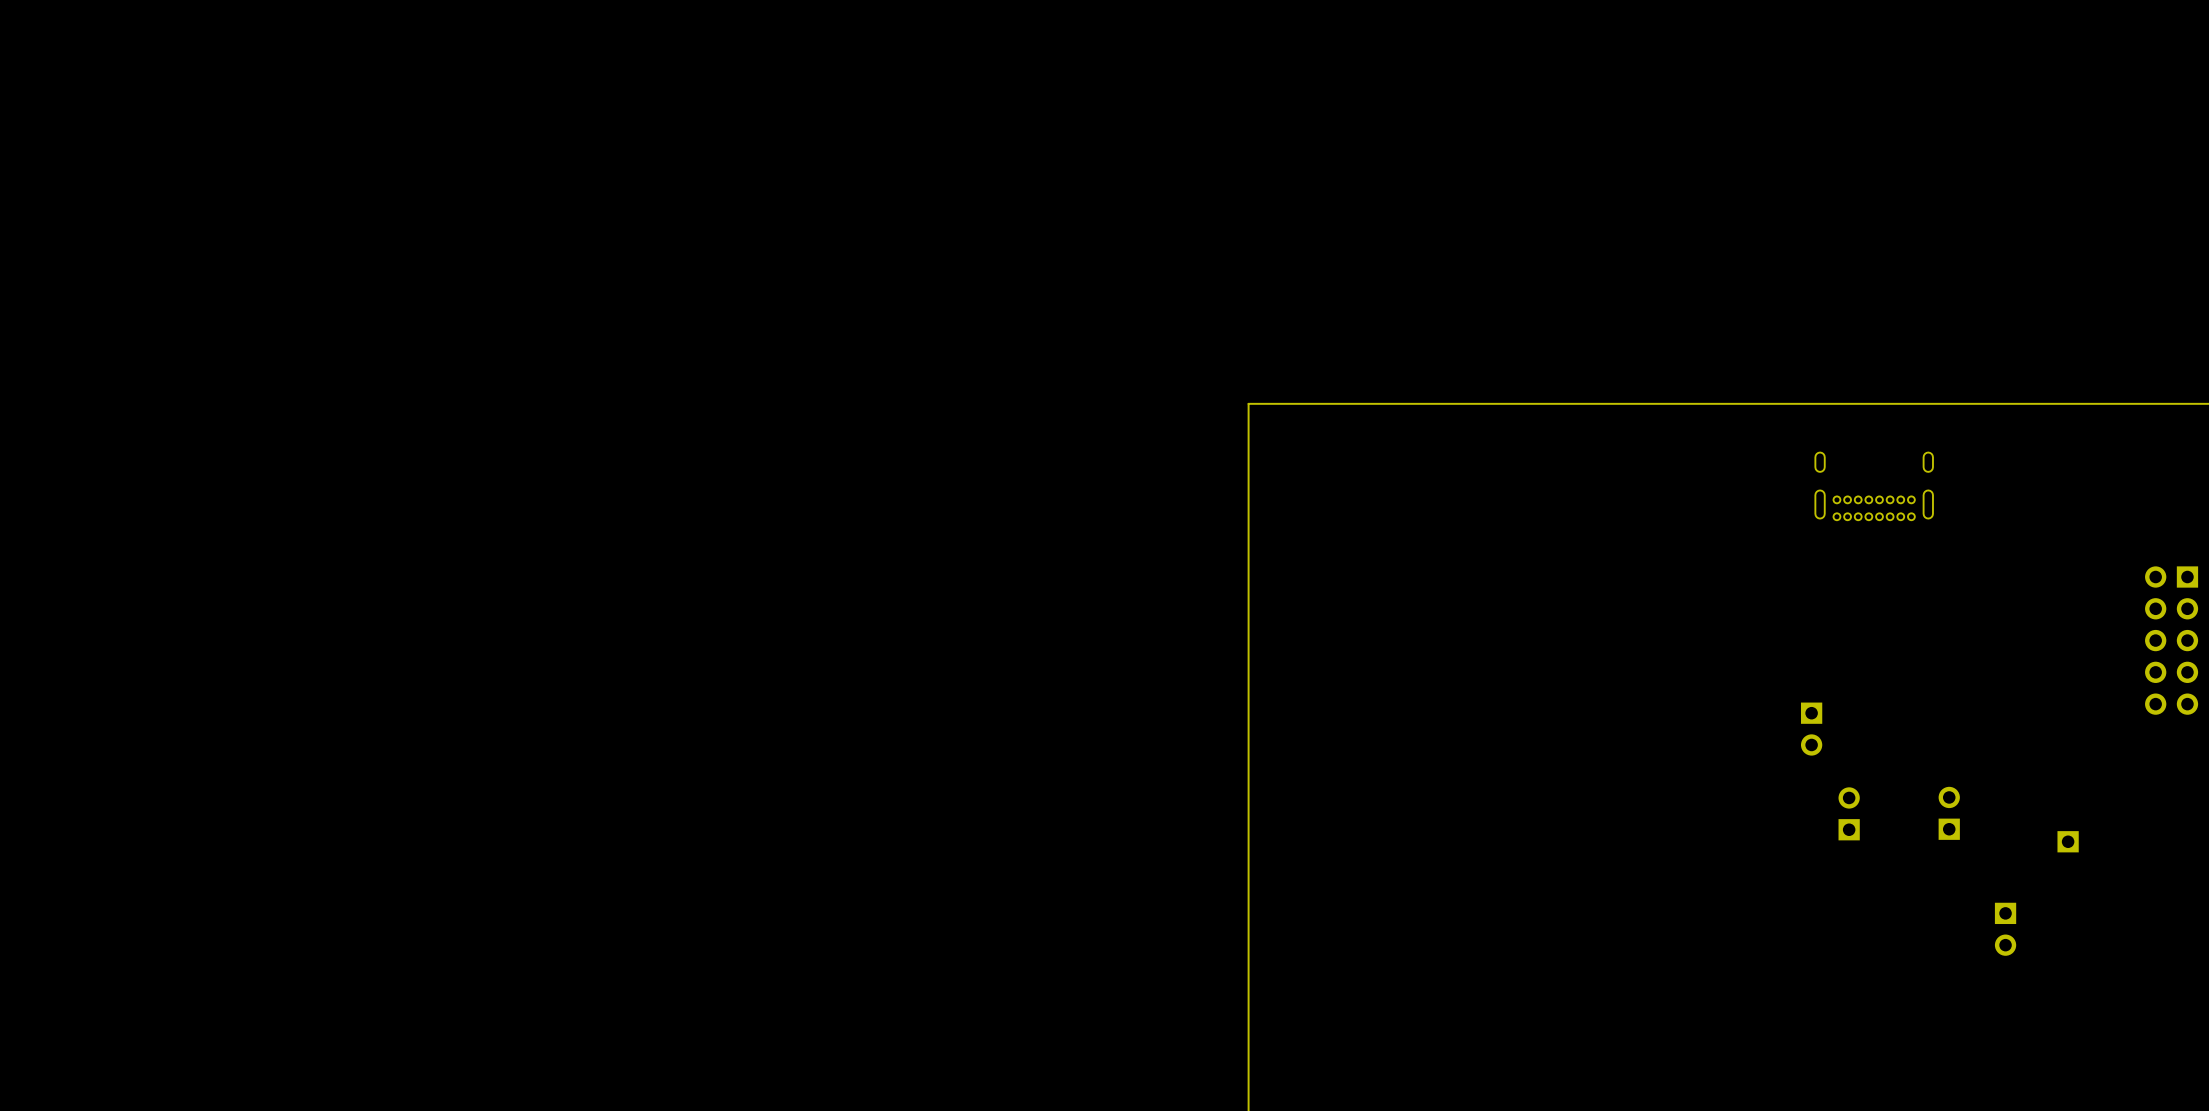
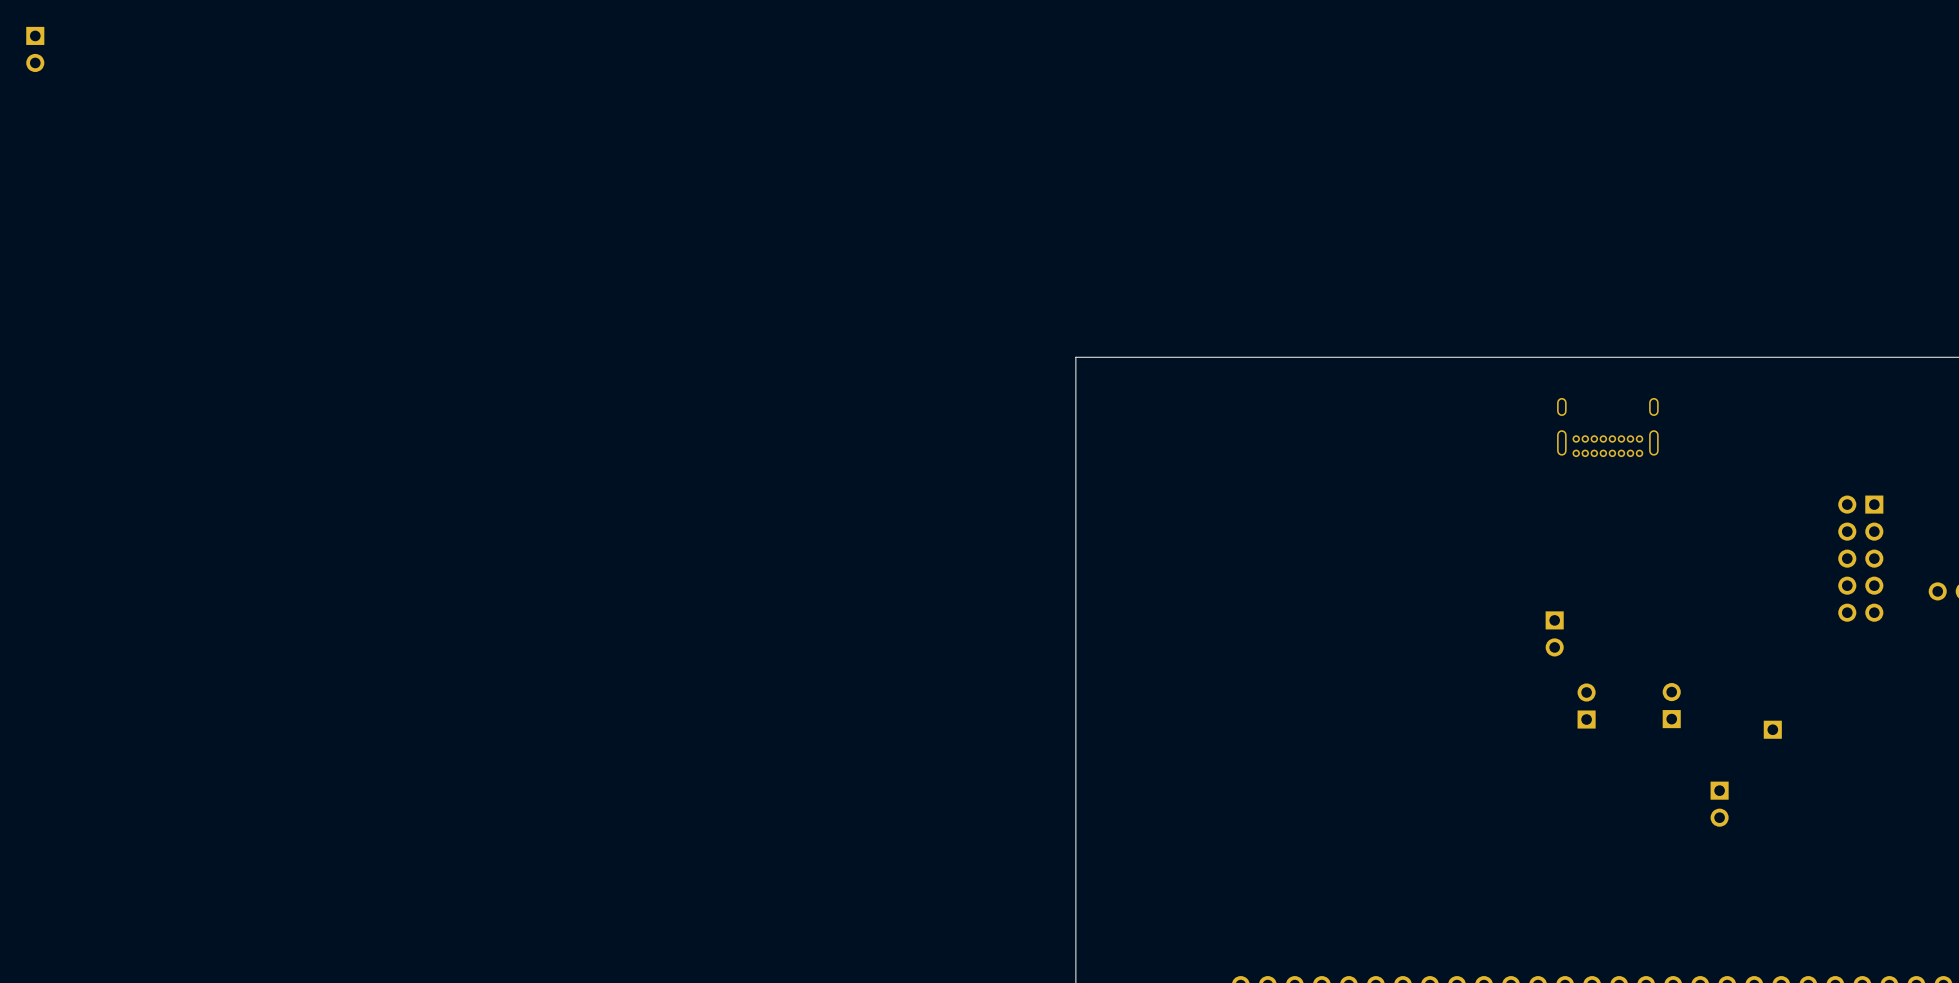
part: none -> (35, 49)

